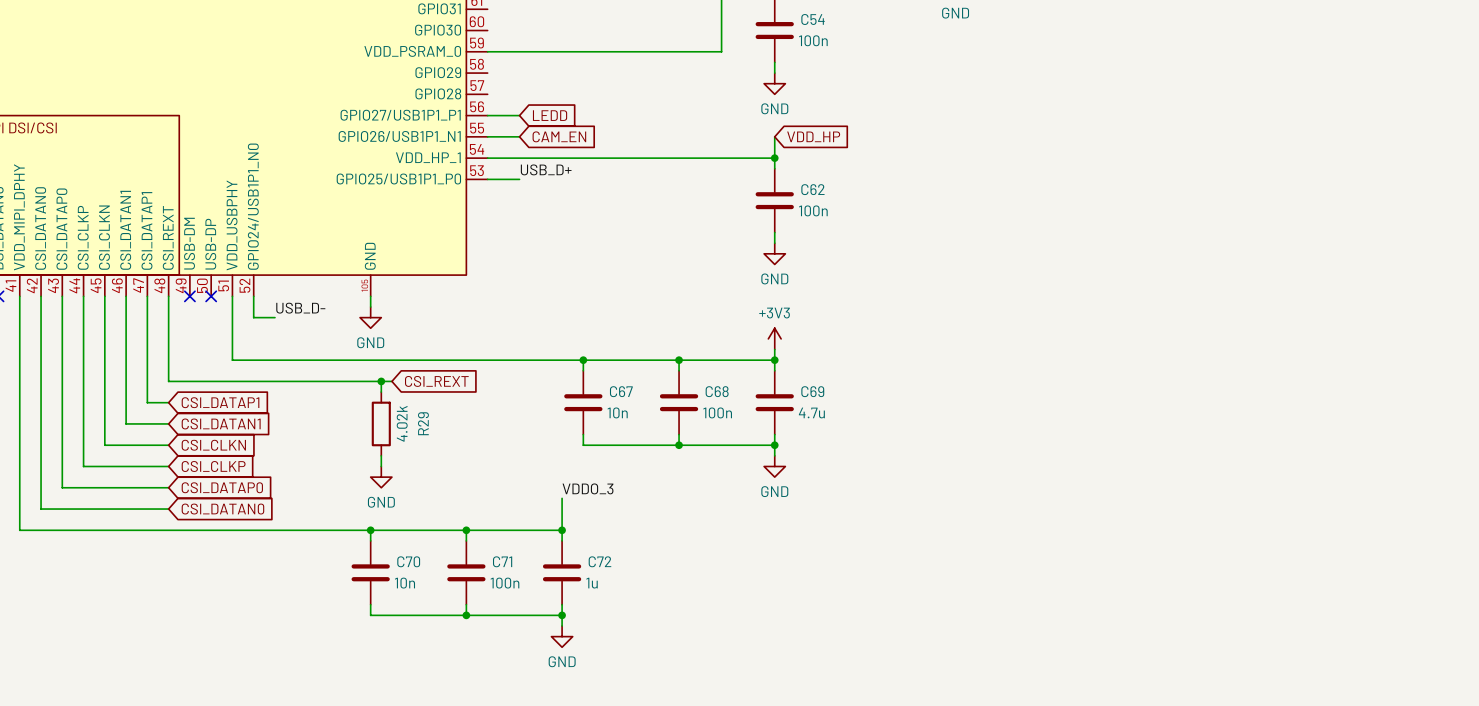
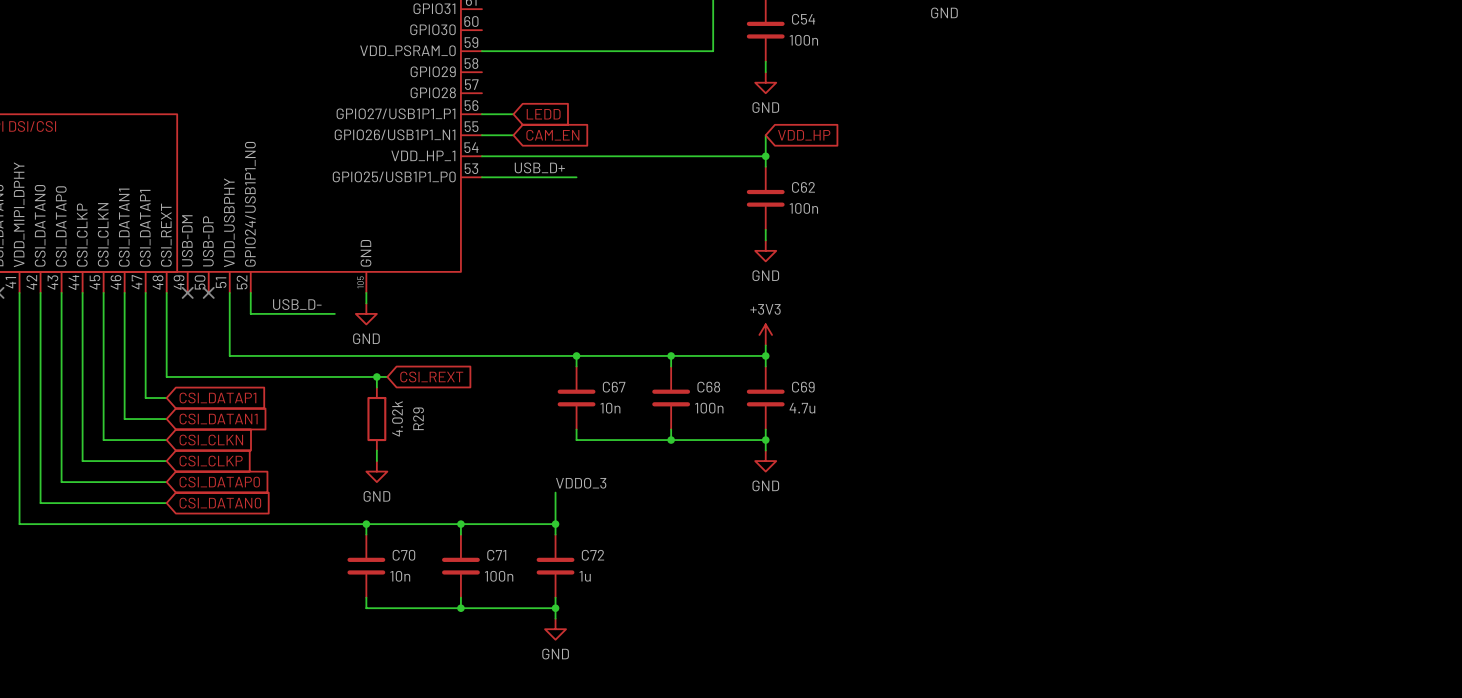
wire: none -> (513, 177) (576, 177)
wire: none -> (271, 313) (334, 313)

